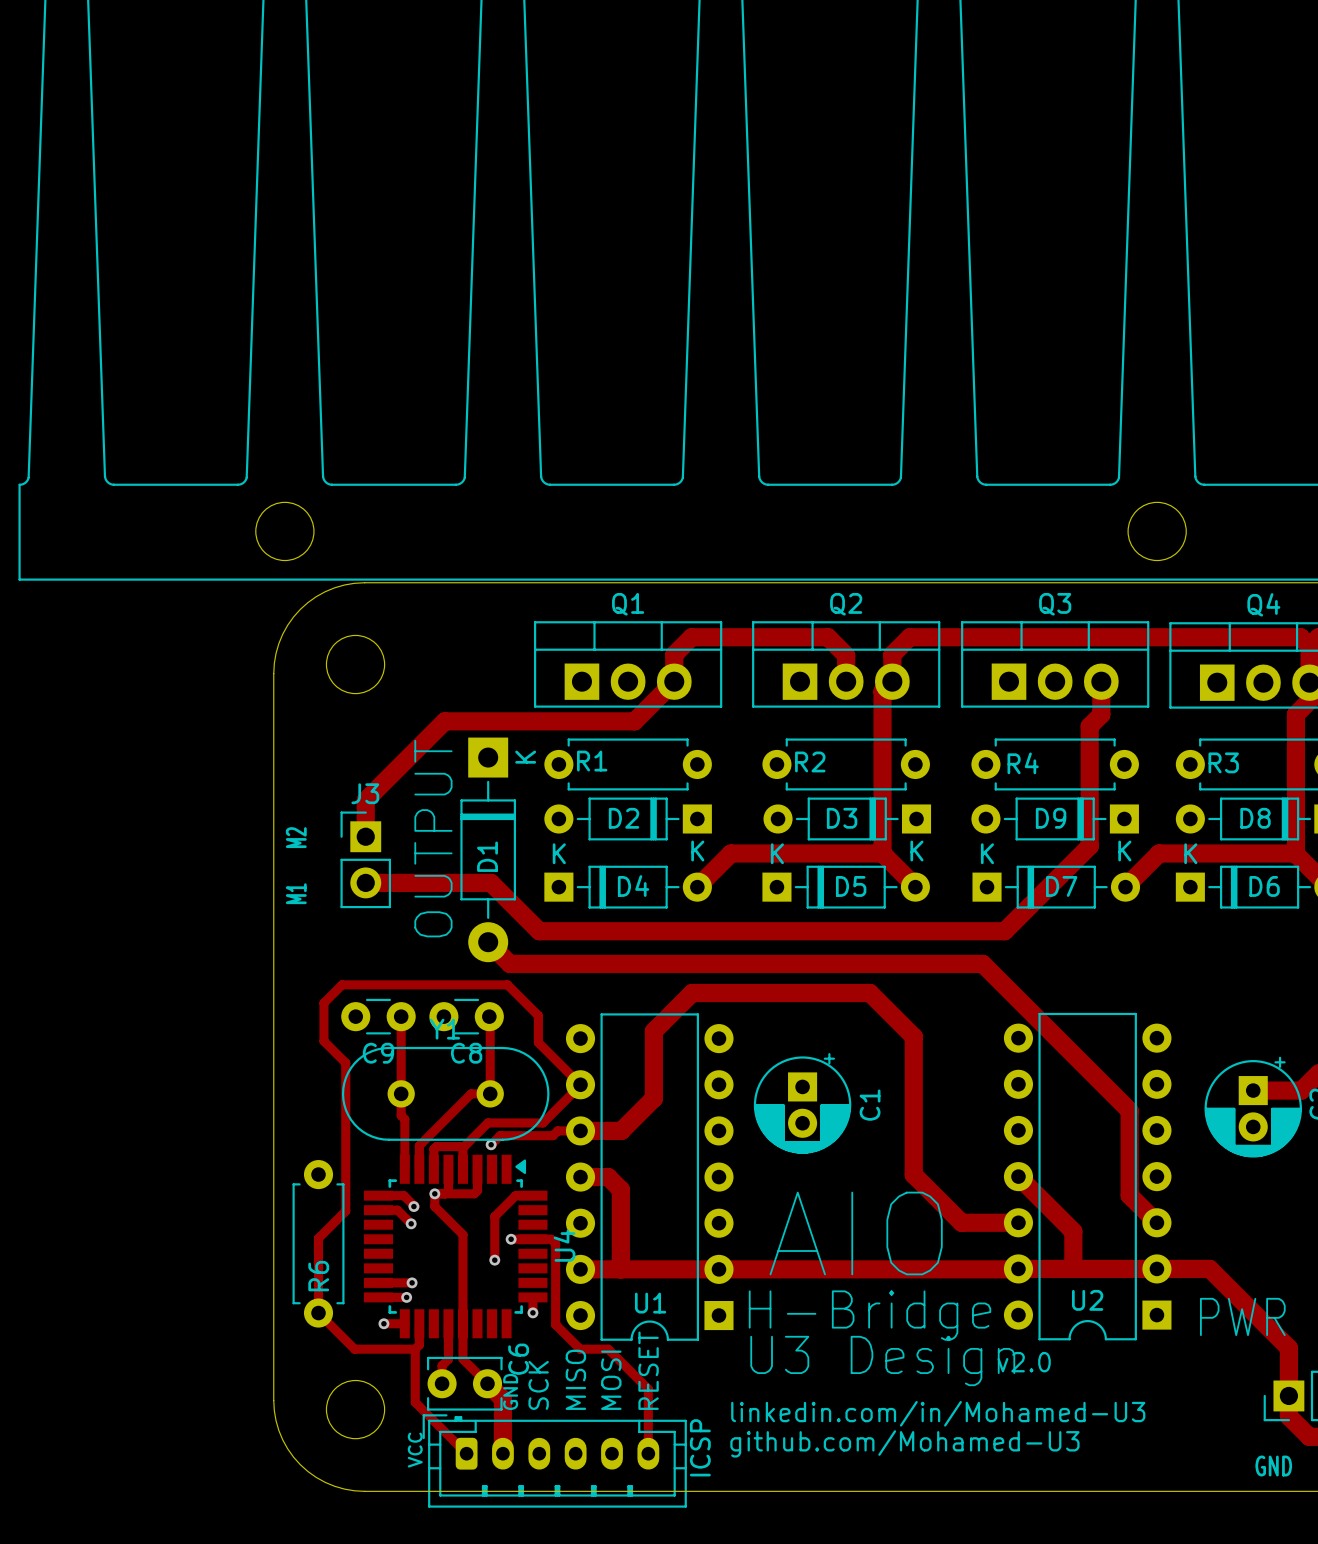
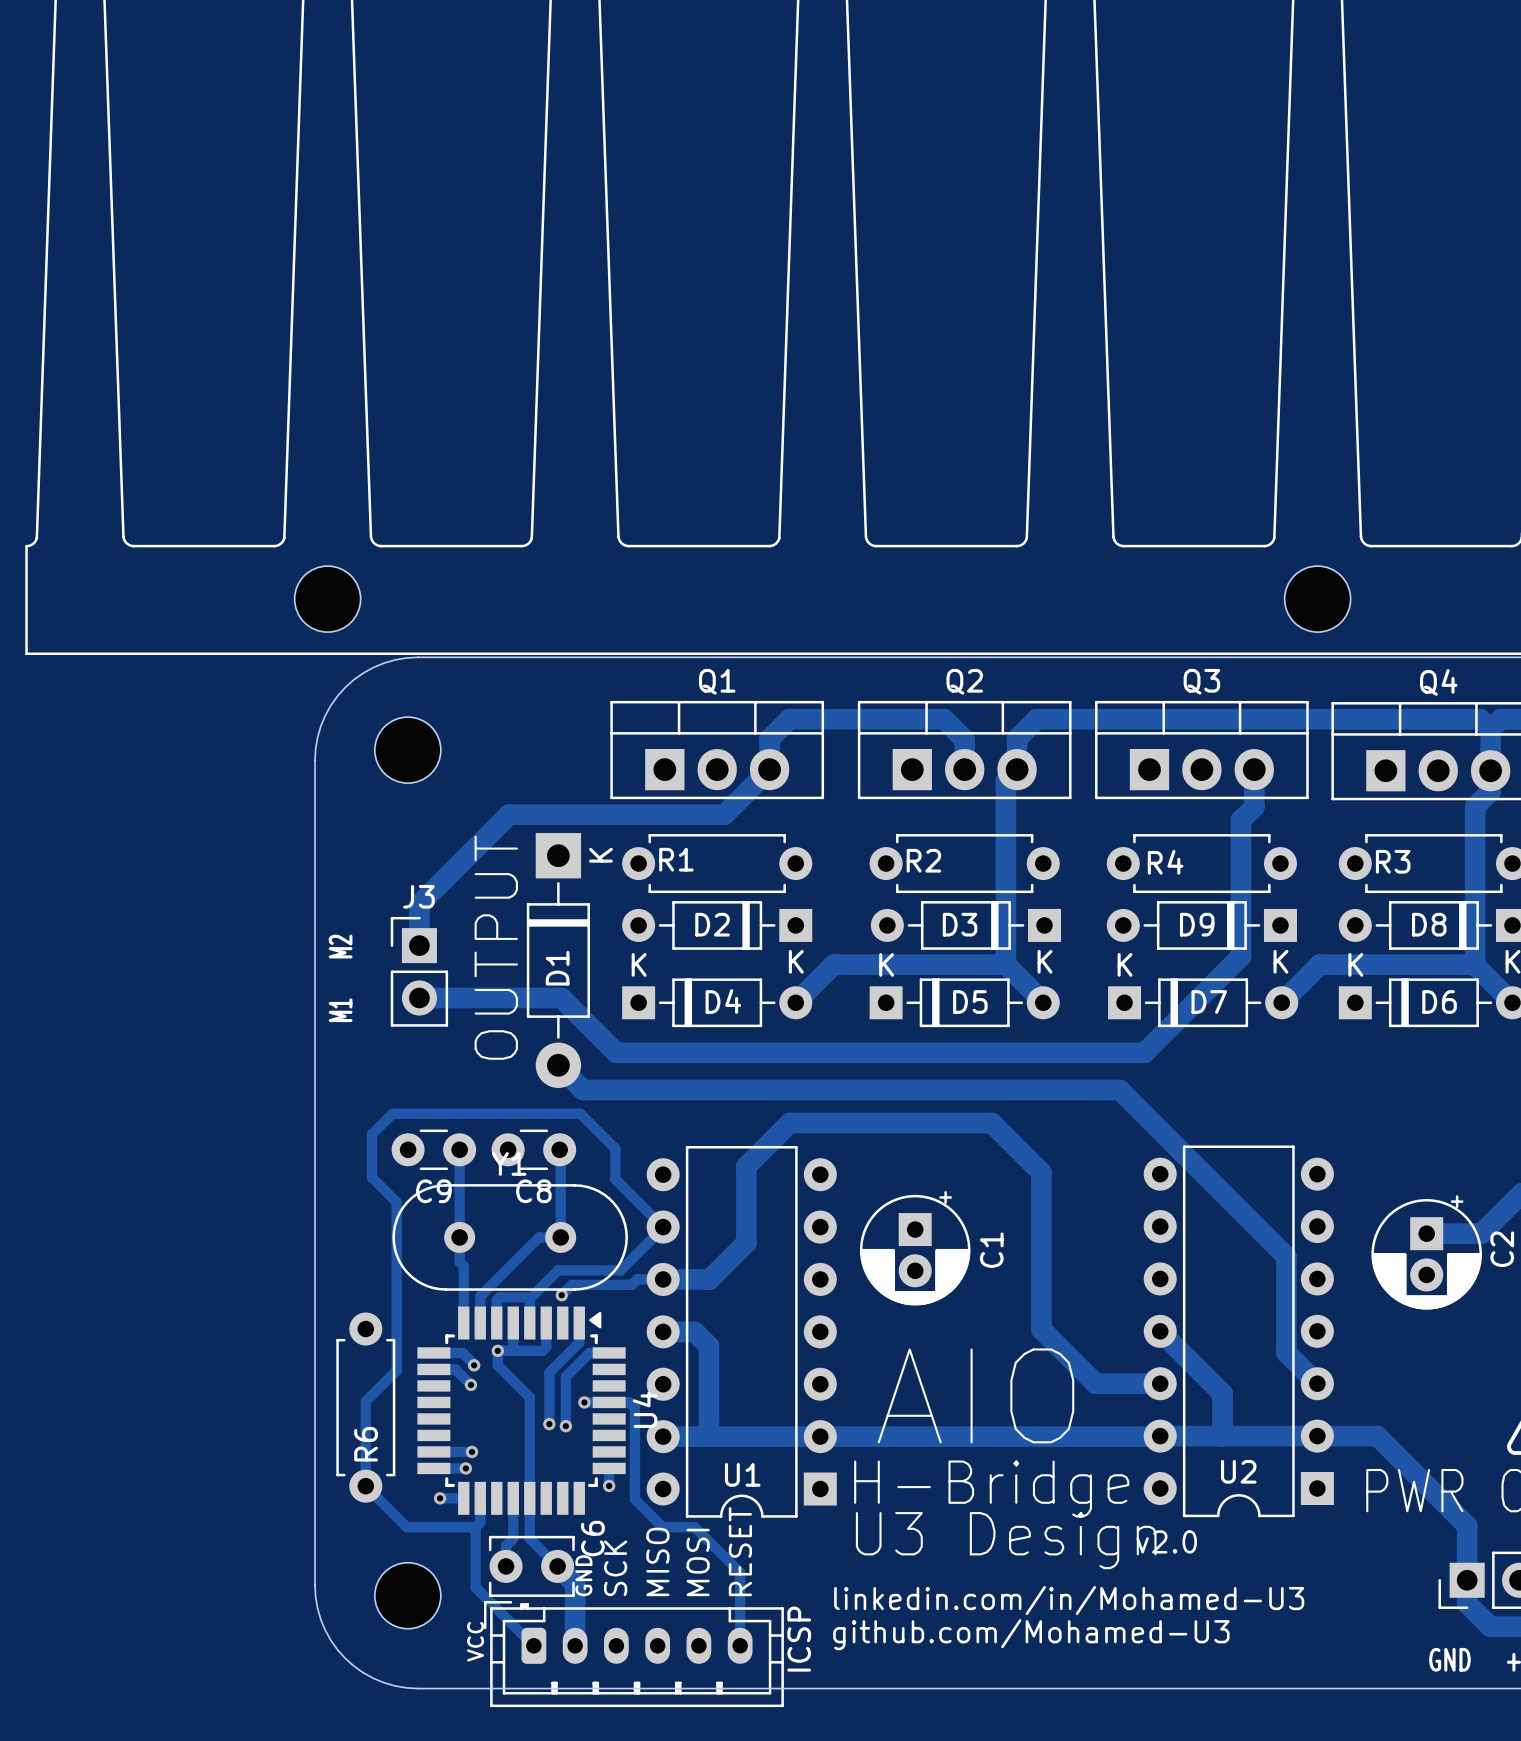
track: none -> (579, 1323) (579, 1342) (549, 1372) (549, 1424)
via: none -> (549, 1424)

